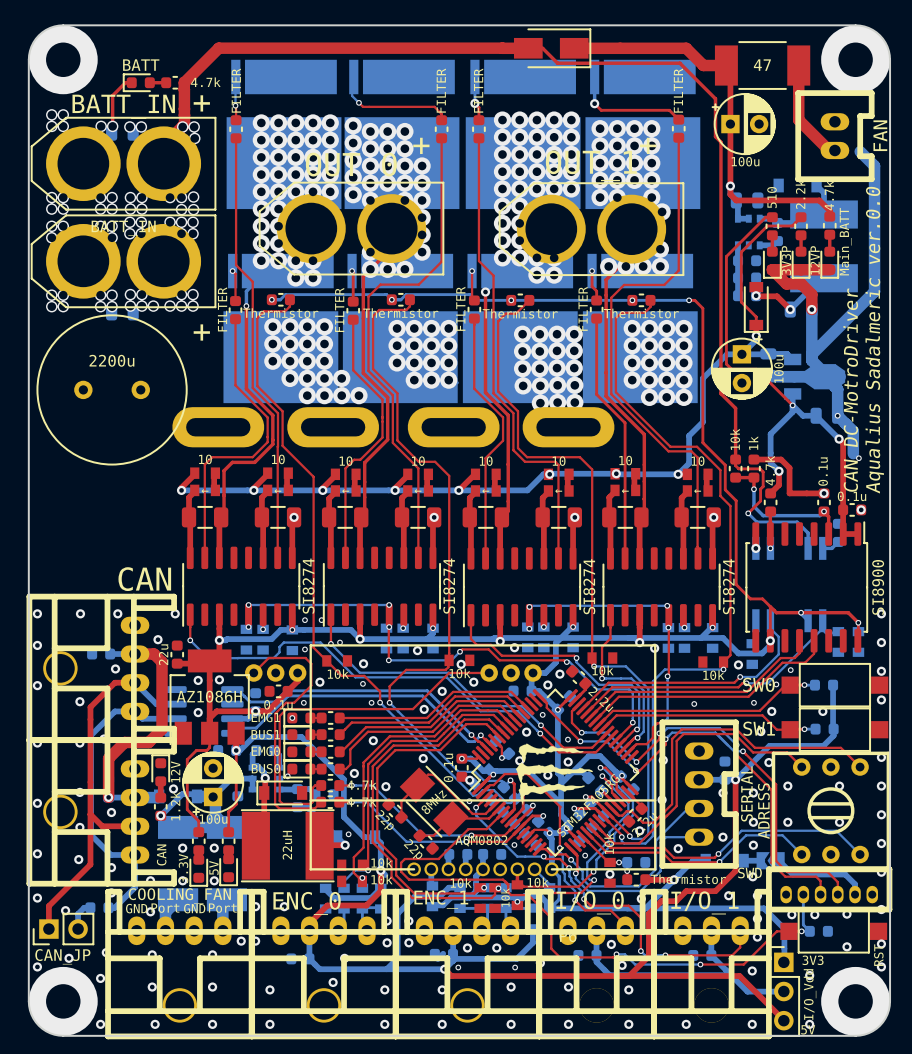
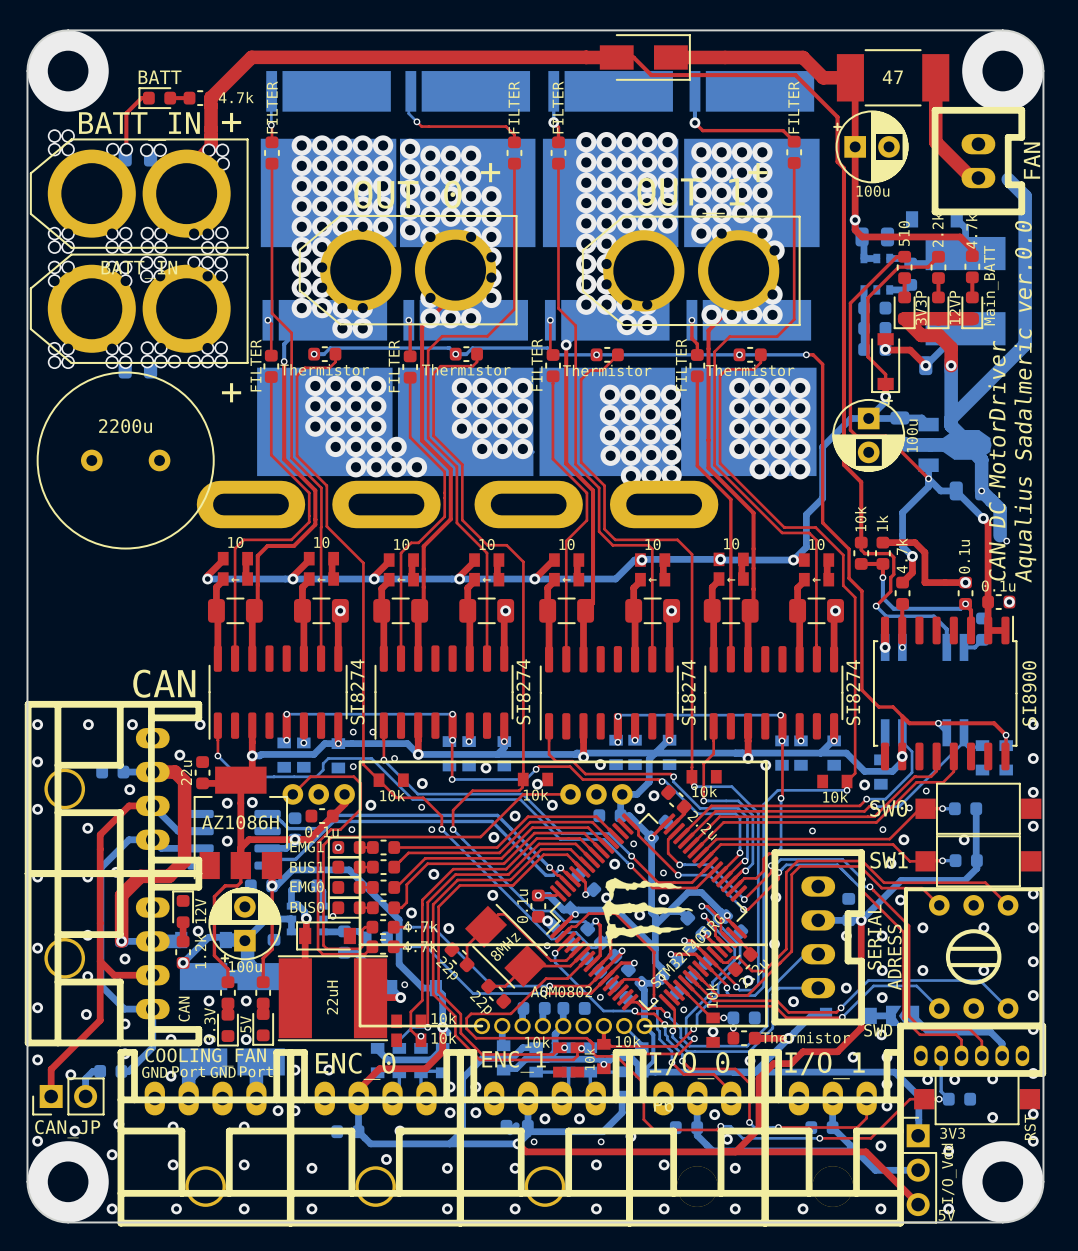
text: CAN DC-MotroDriver (850, 390) -> CAN DC-MotorDriver (997, 460)

